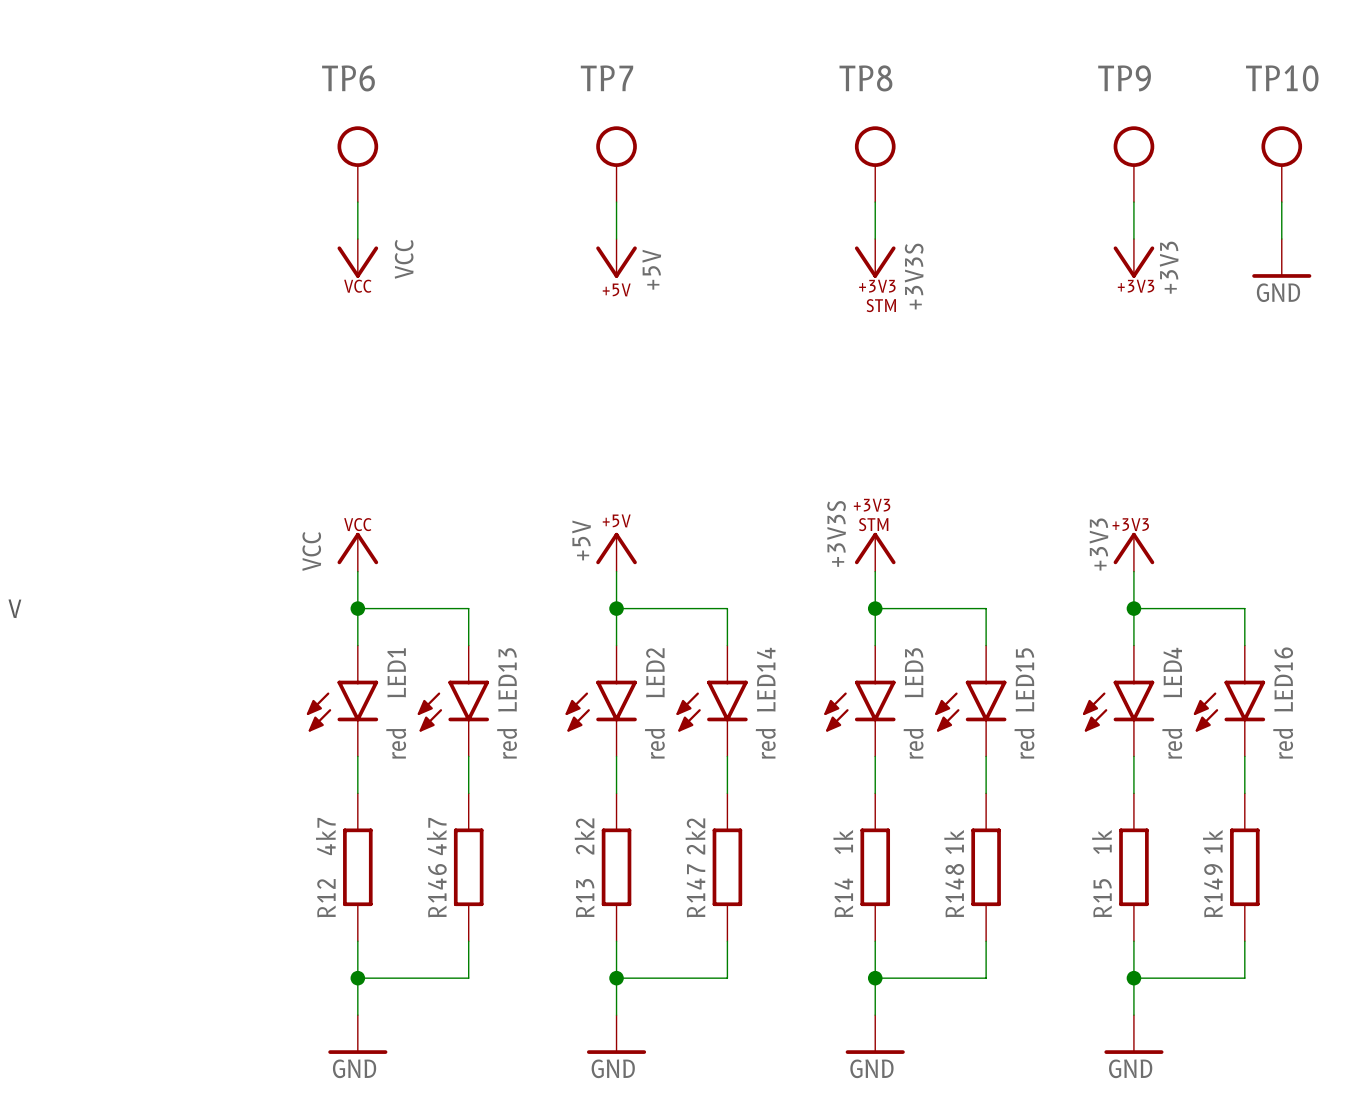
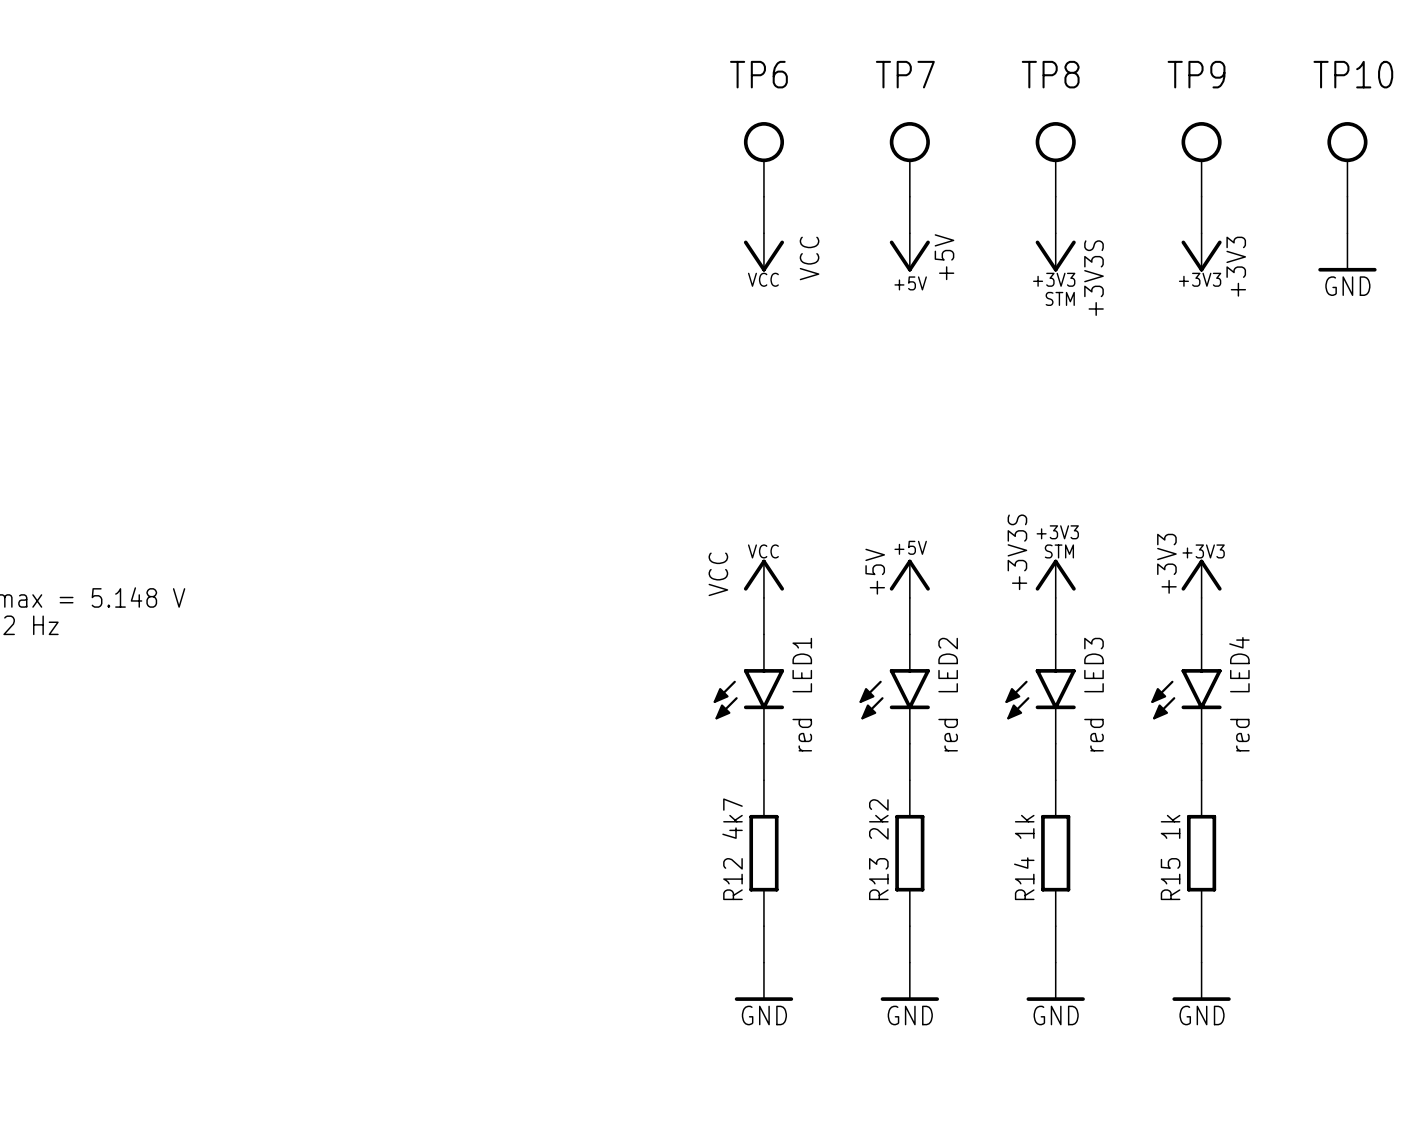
TP6 position: (357, 164) -> (763, 159)
TP7 position: (616, 164) -> (909, 159)
TP8 position: (875, 164) -> (1055, 159)
wire: (357, 202) (357, 239) -> none
wire: (616, 202) (616, 239) -> (763, 196) (763, 233)
wire: (875, 202) (875, 239) -> (909, 196) (909, 233)
wire: none -> (1055, 196) (1055, 233)
power symbol position: VCC (357, 258) -> VCC (763, 252)
power symbol position: +5V (616, 258) -> +5V (909, 252)
power symbol position: +3V3S (875, 258) -> +3V3S (1055, 252)
power symbol position: VCC (357, 552) -> VCC (763, 578)
power symbol position: +5V (616, 552) -> +5V (909, 578)
power symbol position: +3V3S (875, 552) -> +3V3S (1055, 578)
power symbol position: +3V3 (1133, 552) -> +3V3 (1201, 578)
wire: (357, 571) (357, 645) -> none
wire: (616, 571) (616, 645) -> none
wire: (875, 571) (875, 645) -> none
wire: (1133, 571) (1133, 608) (1244, 608) (1244, 645) -> none
wire: (357, 608) (468, 608) (468, 645) -> none
junction: (357, 608) -> none
wire: (616, 608) (727, 608) (727, 645) -> none
junction: (616, 608) -> none
wire: (875, 608) (986, 608) -> none
junction: (875, 608) -> none
junction: (1133, 608) -> none
LED15 name: LED15 (1024, 679) -> LED3 (1094, 665)
LED1 position: (342, 700) -> (748, 689)
LED13: red (453, 700) -> none
LED2 position: (601, 700) -> (894, 689)
LED14: red (712, 700) -> none
LED3: red (859, 700) -> none
LED16: red (1229, 700) -> none
wire: (357, 756) (357, 793) -> none
wire: (468, 756) (468, 793) -> (763, 597) (763, 634)
wire: (616, 756) (616, 793) -> (909, 597) (909, 634)
wire: (727, 756) (727, 793) -> (763, 743) (763, 780)
wire: (875, 756) (875, 793) -> (909, 743) (909, 780)
wire: (1244, 756) (1244, 793) -> none
R12 position: (357, 867) -> (763, 853)
R146: 4k7 (468, 867) -> none
R13 position: (616, 867) -> (909, 853)
R147: 2k2 (727, 867) -> none
R14: 1k (875, 867) -> none
R149: 1k (1244, 867) -> none
R148 name: R148 (954, 890) -> R14 (1024, 878)
wire: (357, 941) (357, 1015) -> none
wire: (468, 941) (468, 978) (357, 978) -> none
wire: (616, 941) (616, 1015) -> none
wire: none -> (763, 926) (763, 962)
wire: (727, 941) (727, 978) (616, 978) -> none
wire: none -> (909, 926) (909, 962)
wire: (875, 941) (875, 1015) -> none
wire: (1244, 941) (1244, 978) (1133, 978) (1133, 1015) -> none
junction: (357, 978) -> none
junction: (616, 978) -> none
wire: (875, 978) (986, 978) -> none
junction: (875, 978) -> none
junction: (1133, 978) -> none
power symbol: none -> GND (1055, 981)
power symbol: GND (357, 1034) -> none
power symbol position: GND (616, 1034) -> GND (763, 981)
power symbol position: GND (875, 1034) -> GND (909, 981)
power symbol position: GND (1133, 1034) -> GND (1201, 981)

